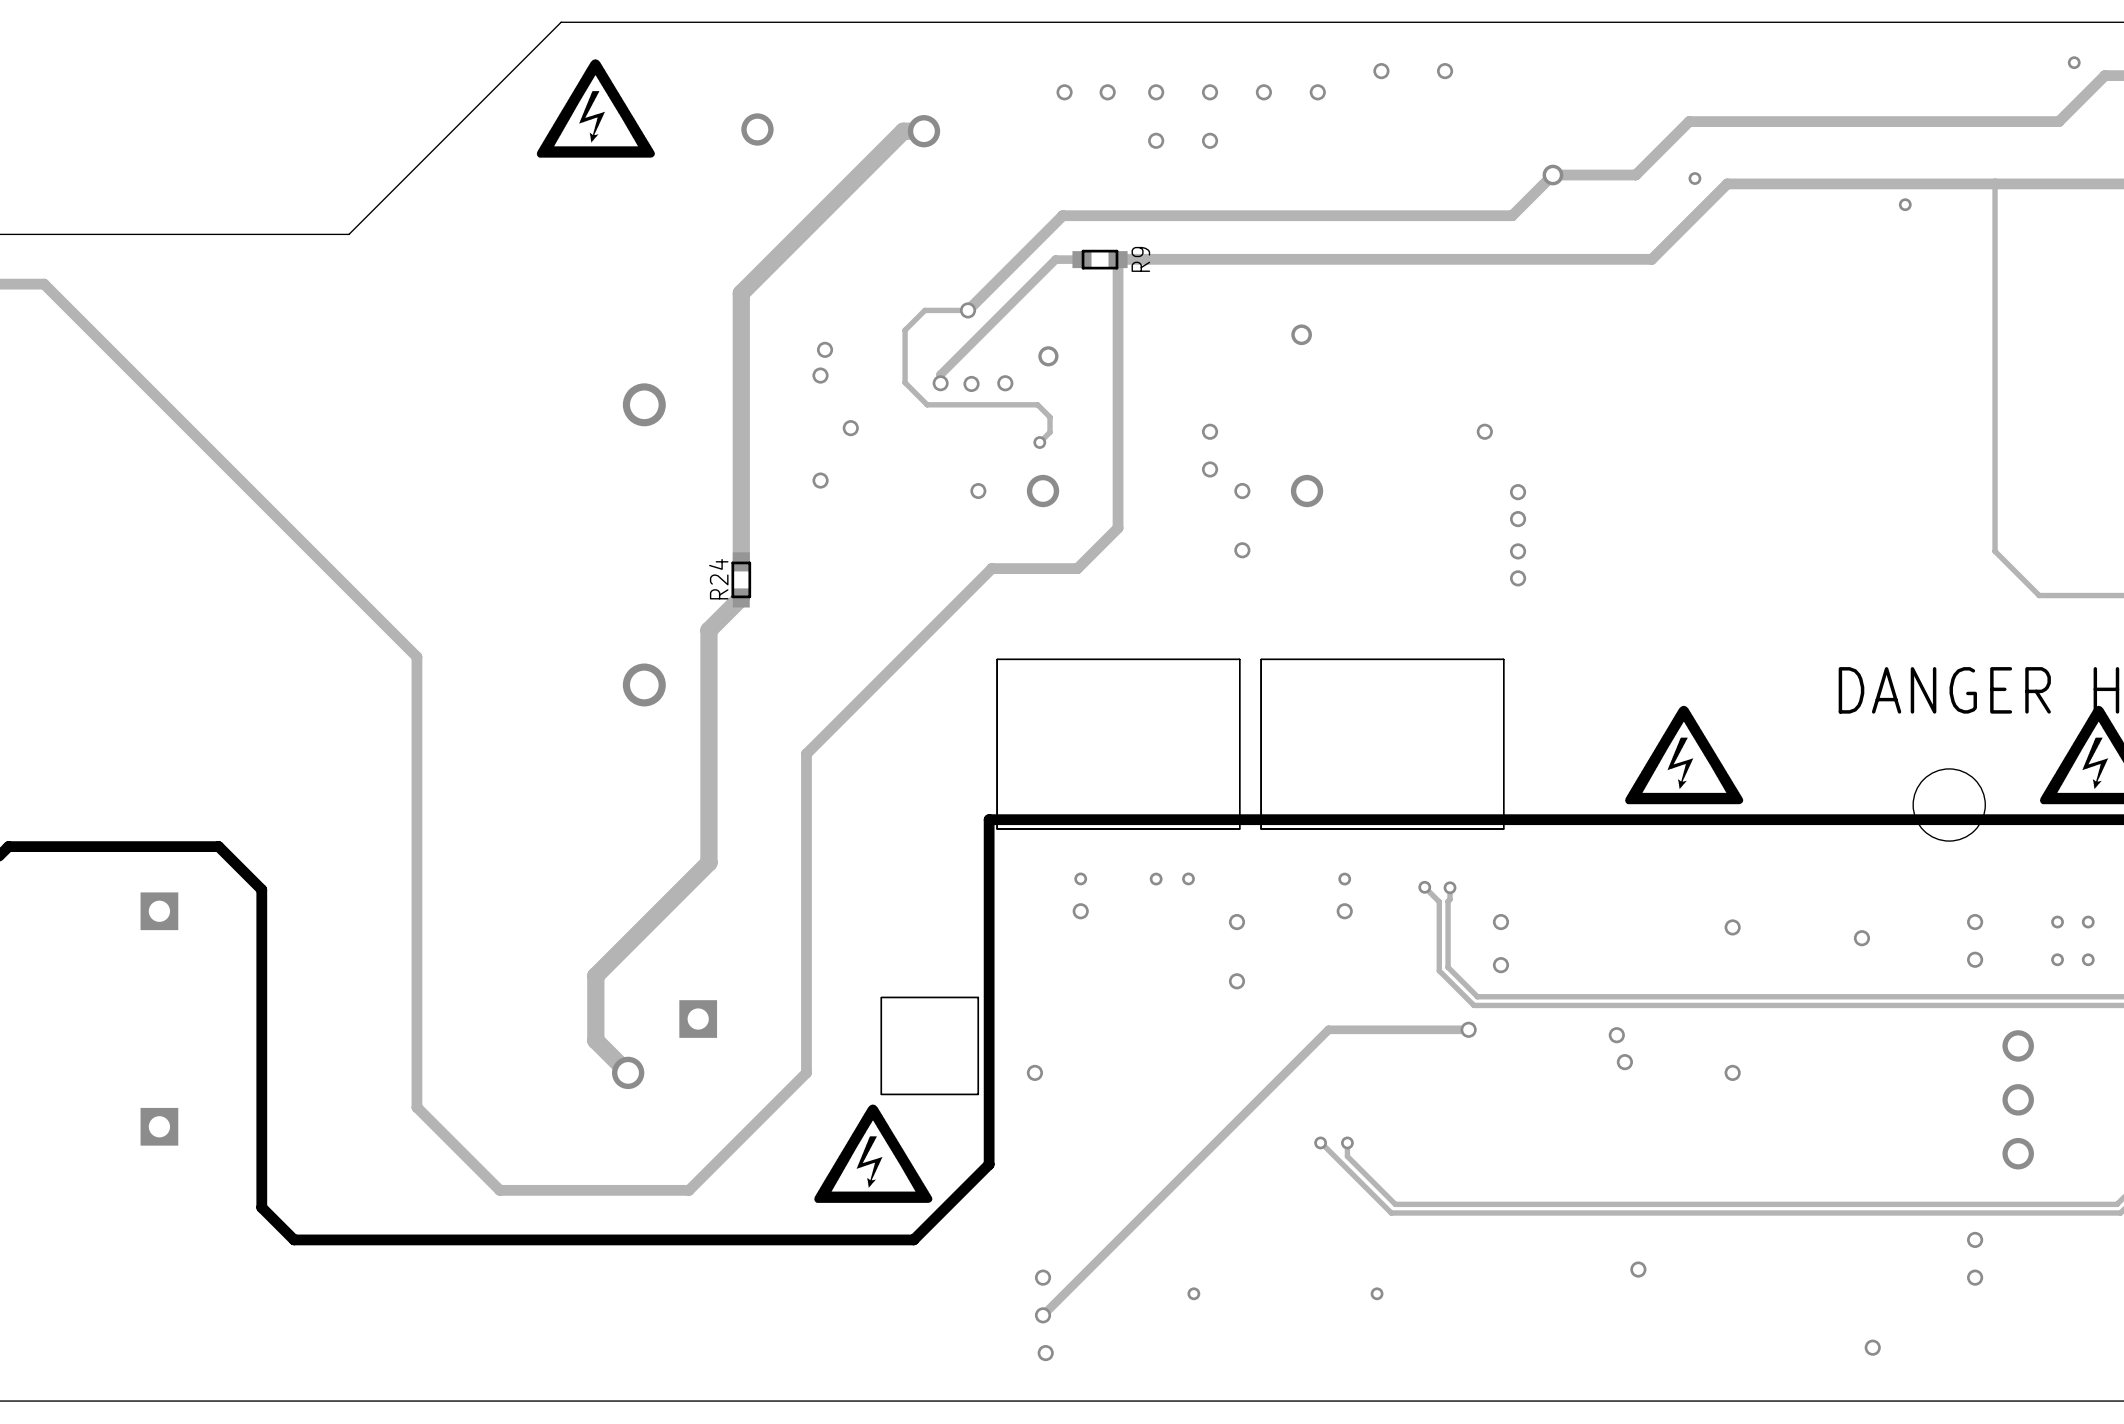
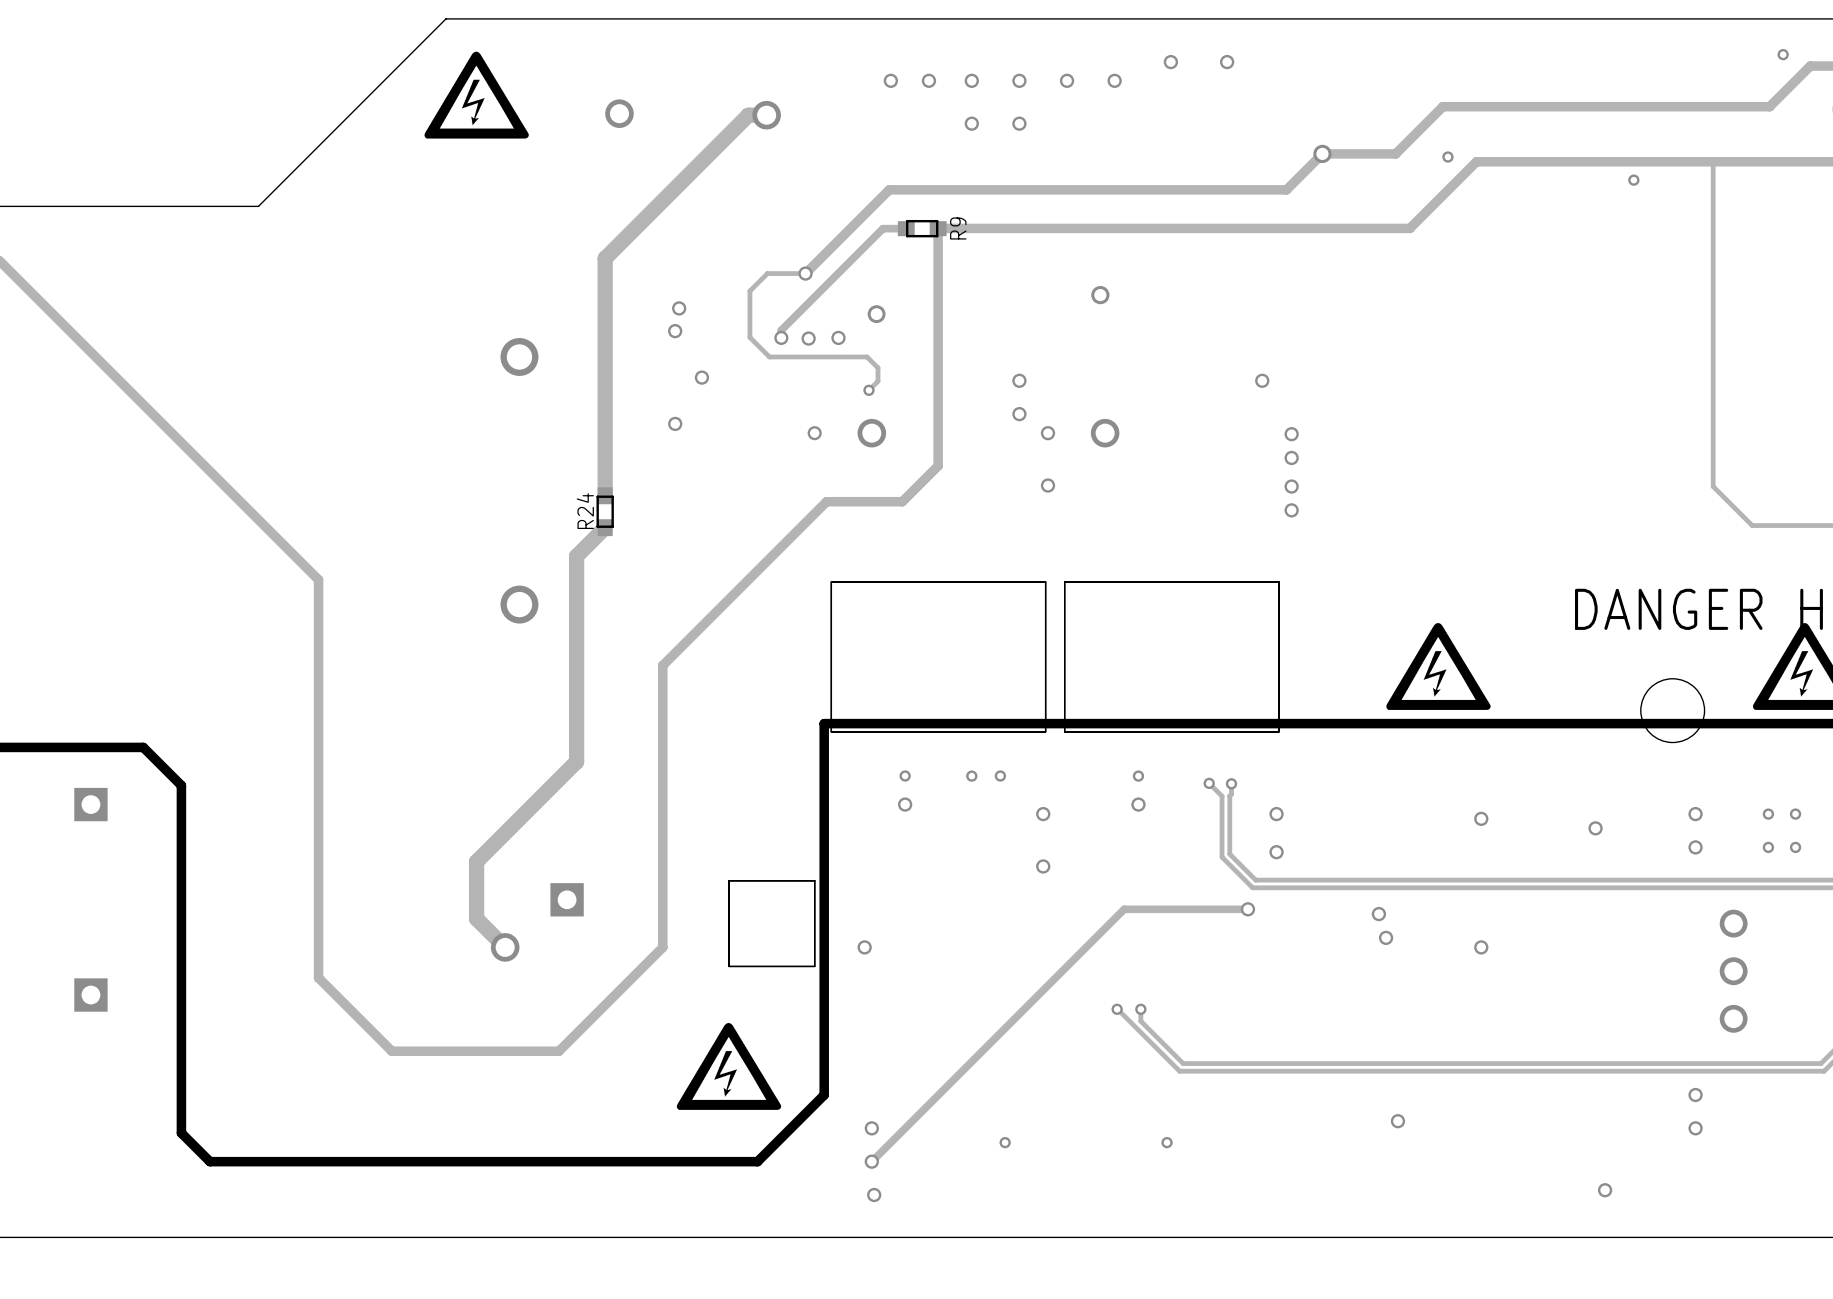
drawing position: (873, 1153) -> (728, 1066)
line: (989, 1164) (913, 1239) (294, 1239) (261, 1207) -> (824, 1028) (824, 1095) (757, 1161) (209, 1161) (181, 1133) (181, 1066)

